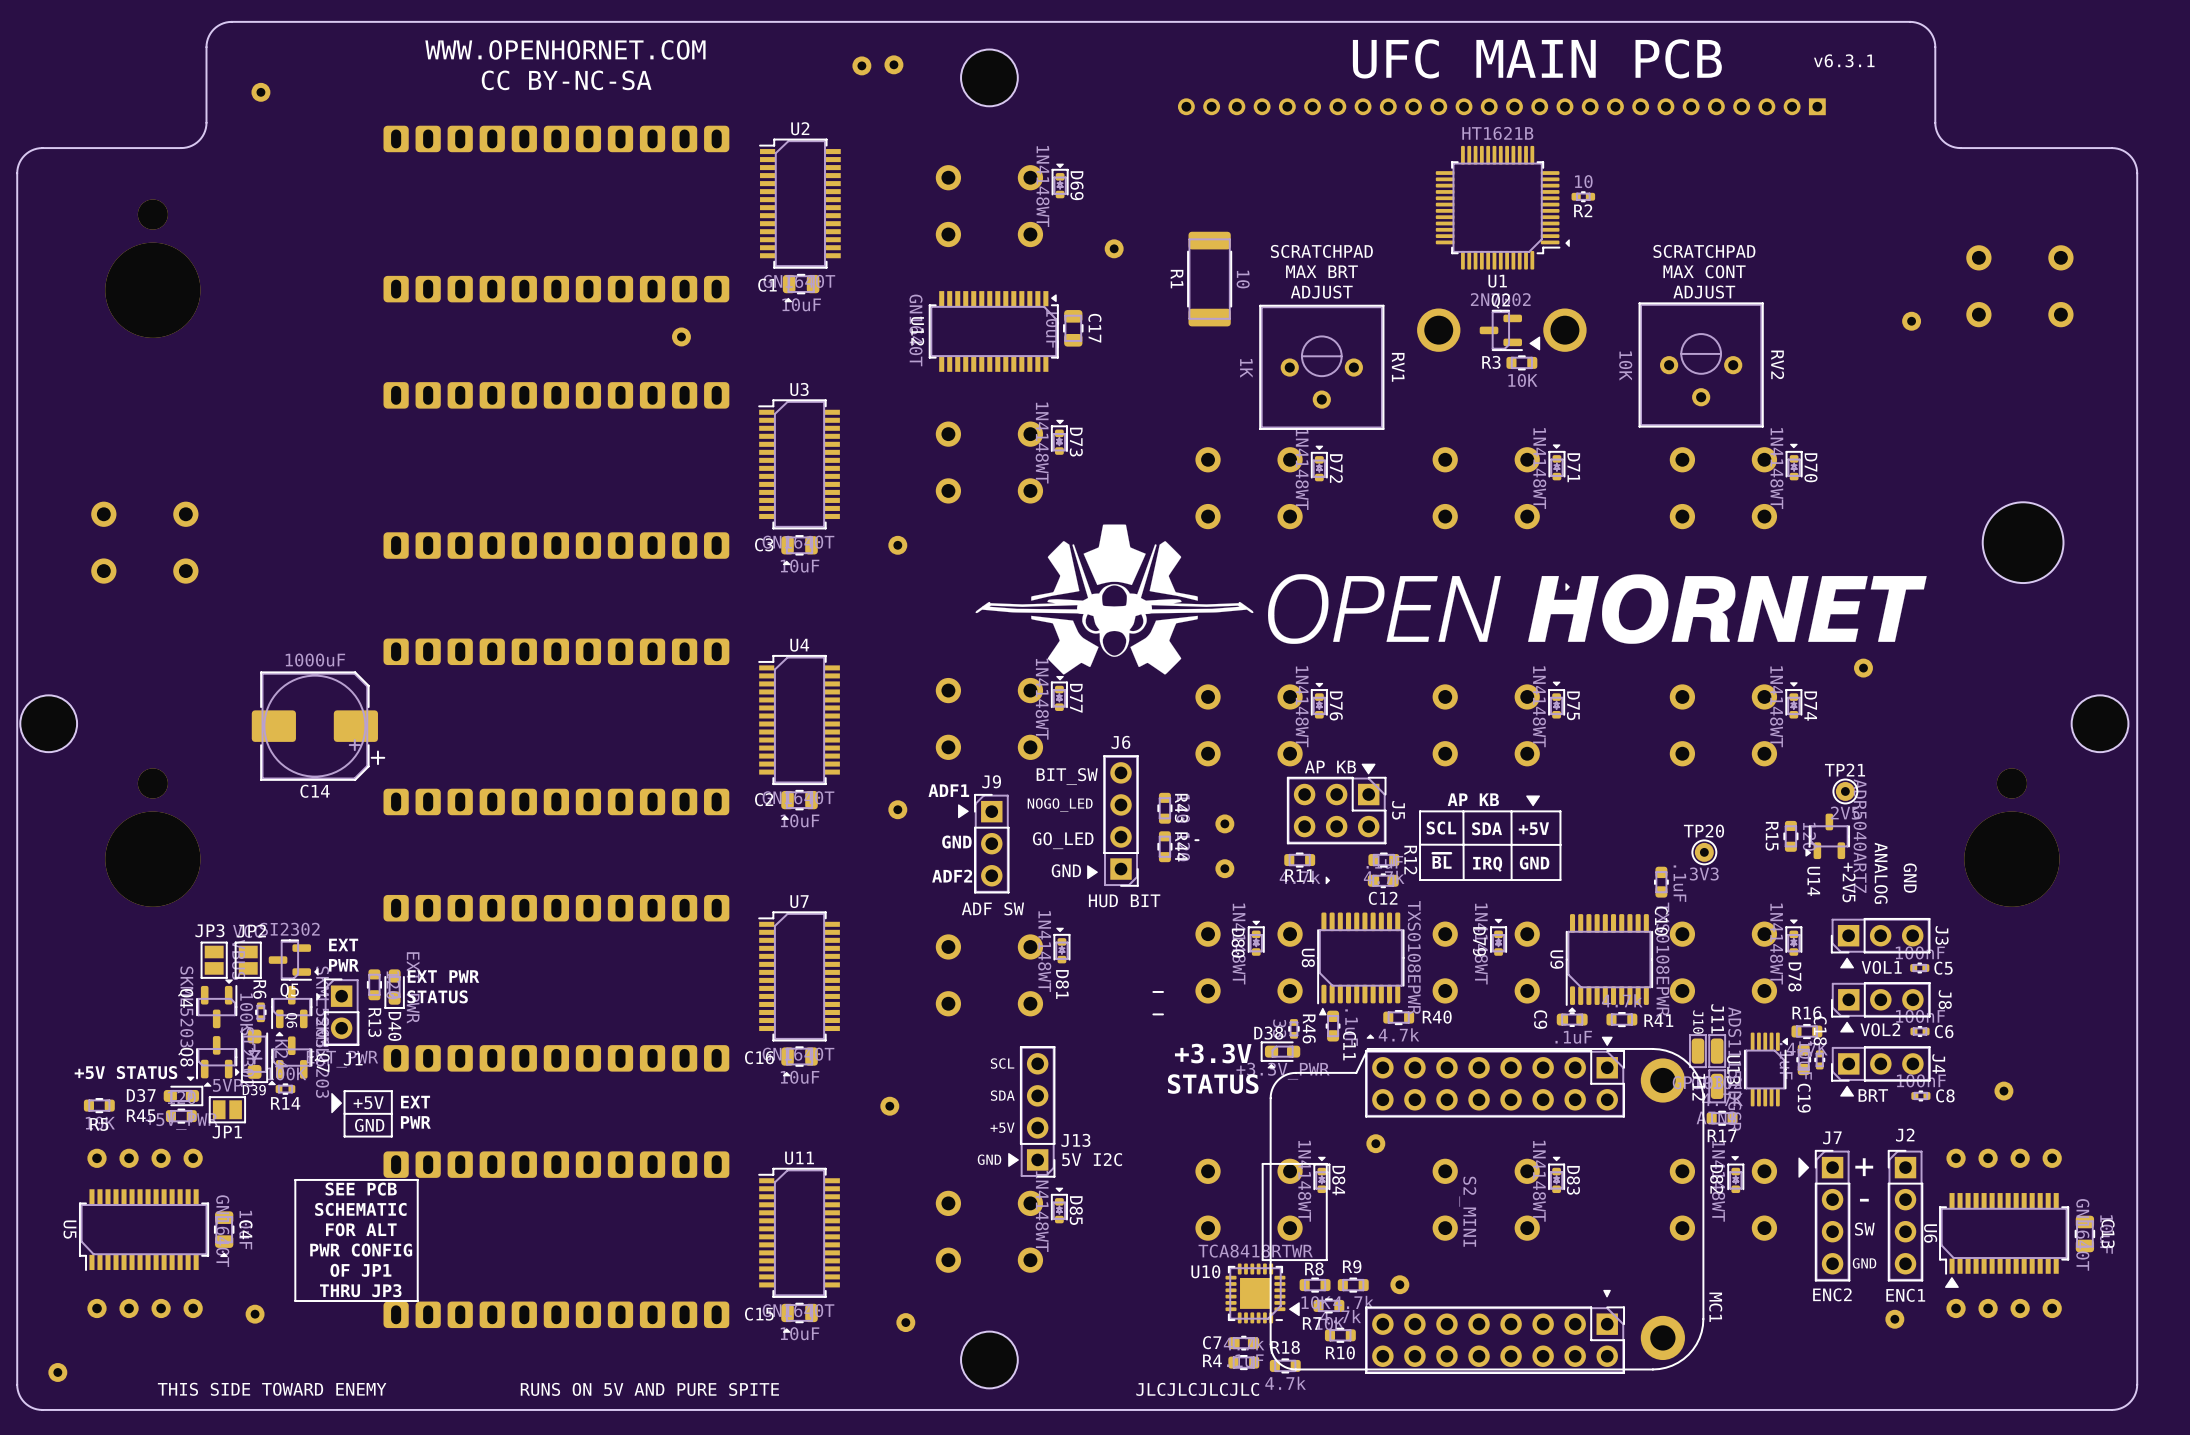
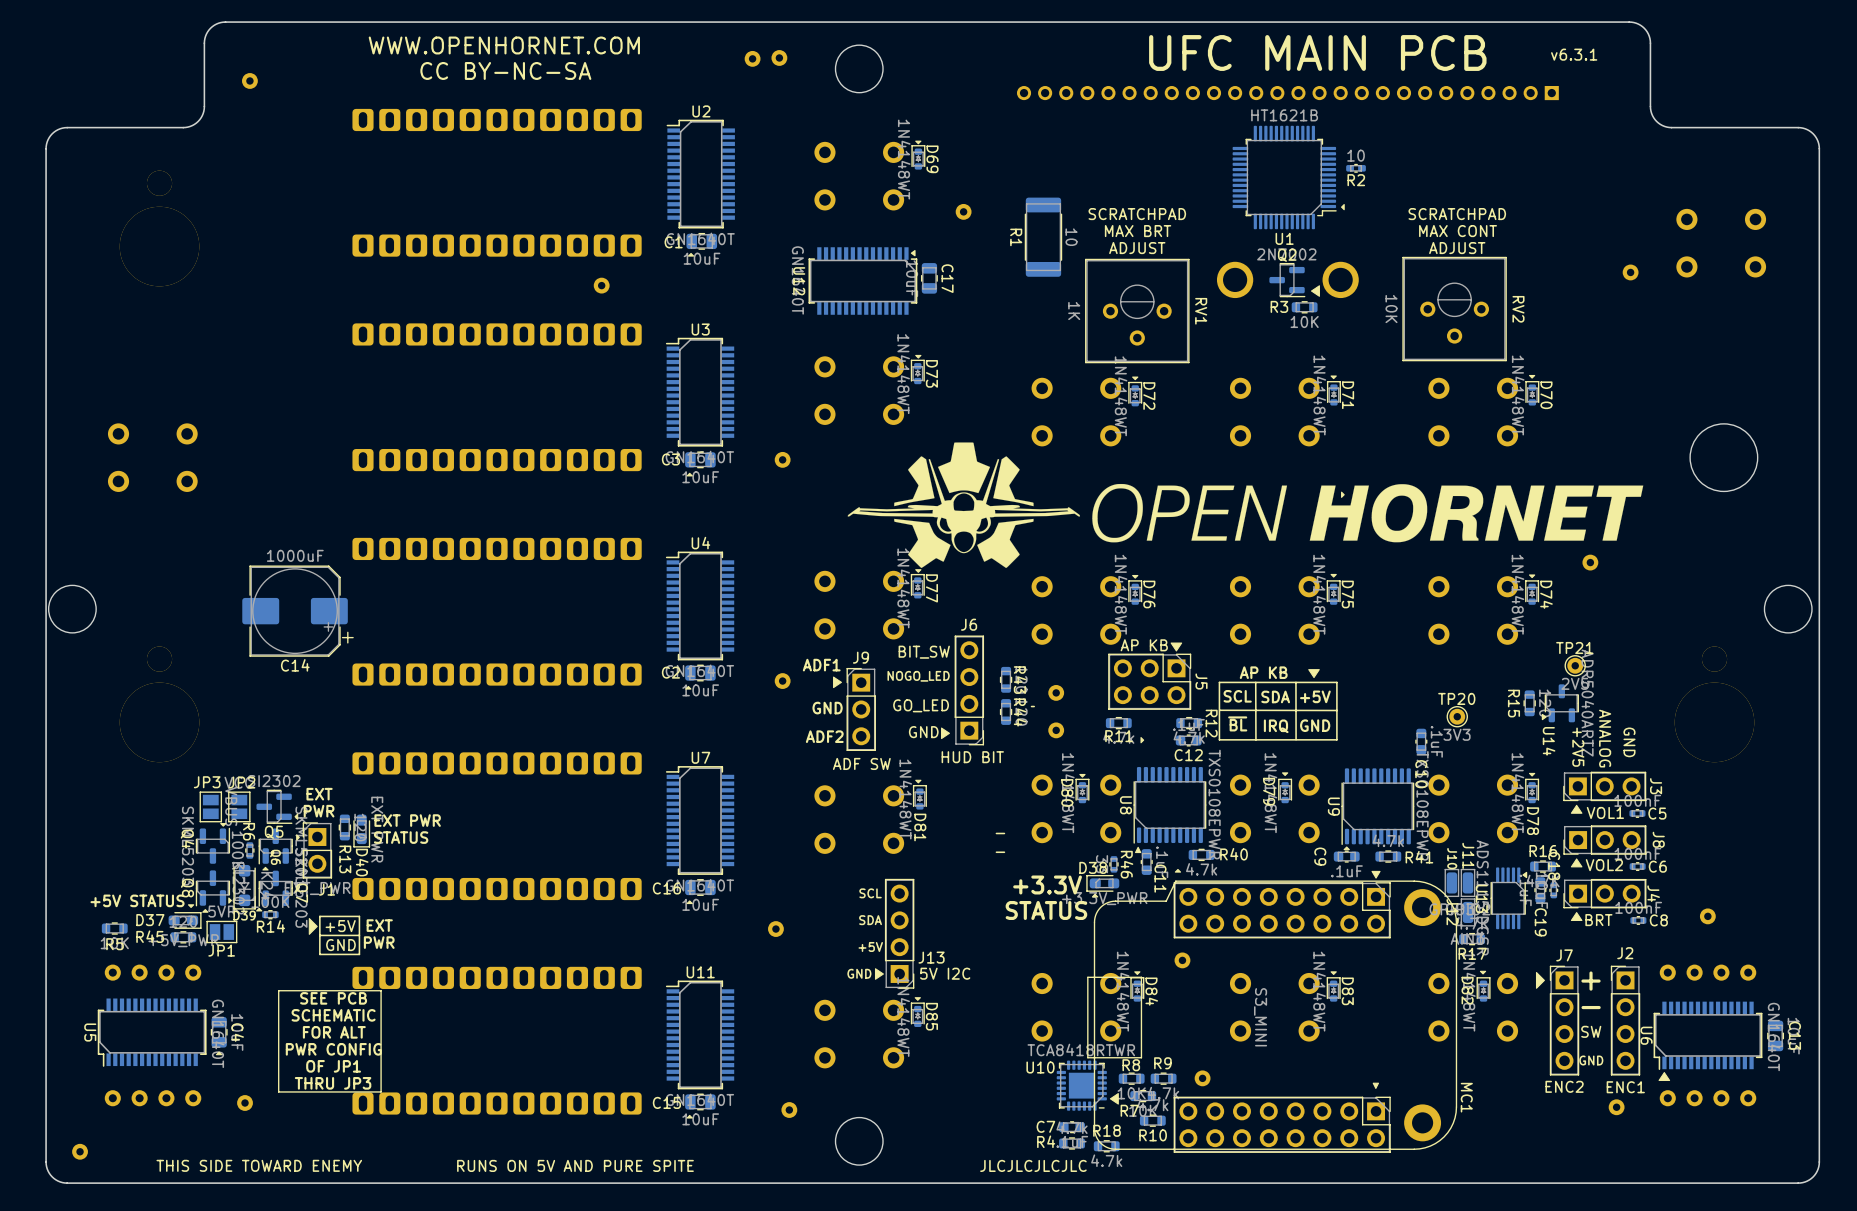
MC1 value: S2_MINI (1467, 1211) -> S3_MINI (1260, 1017)

